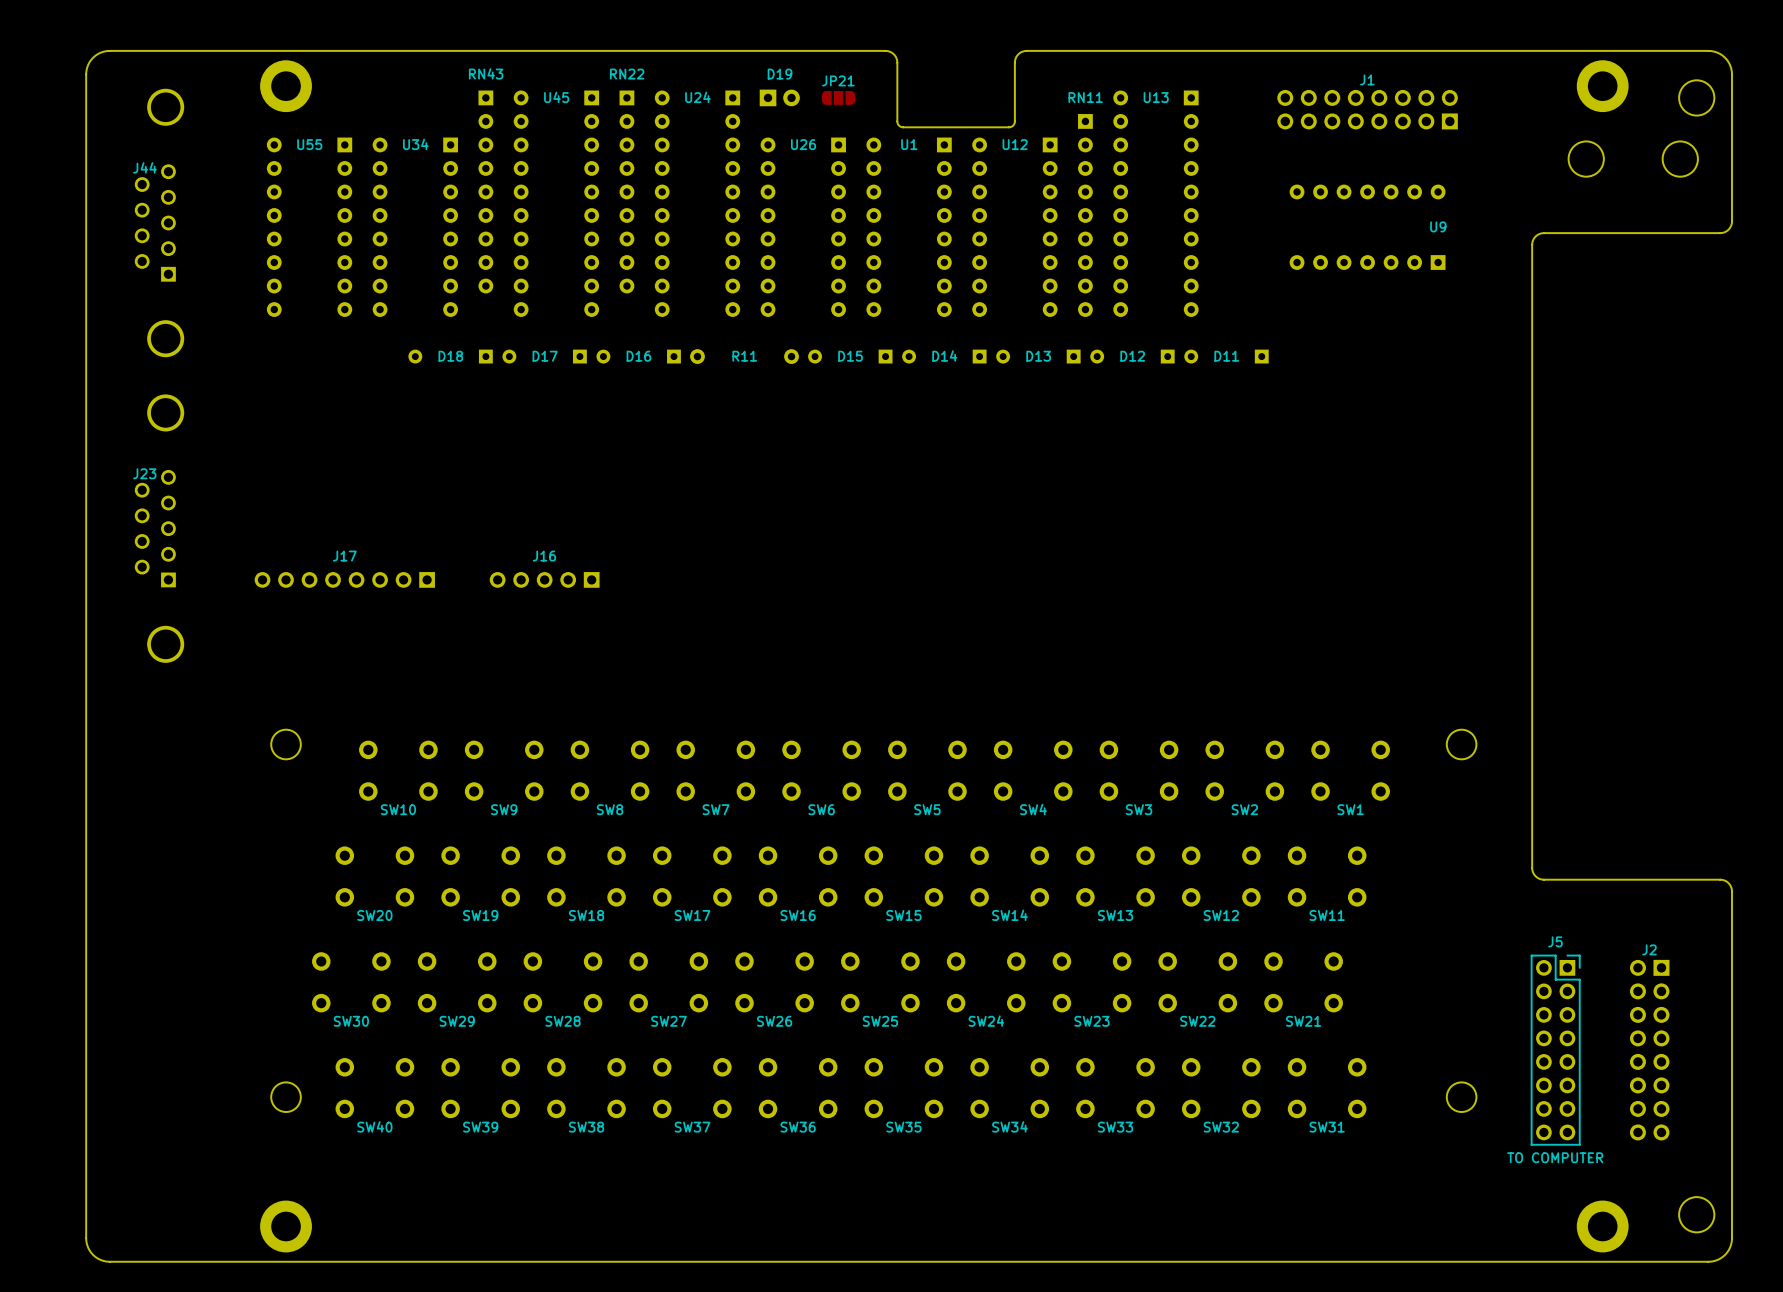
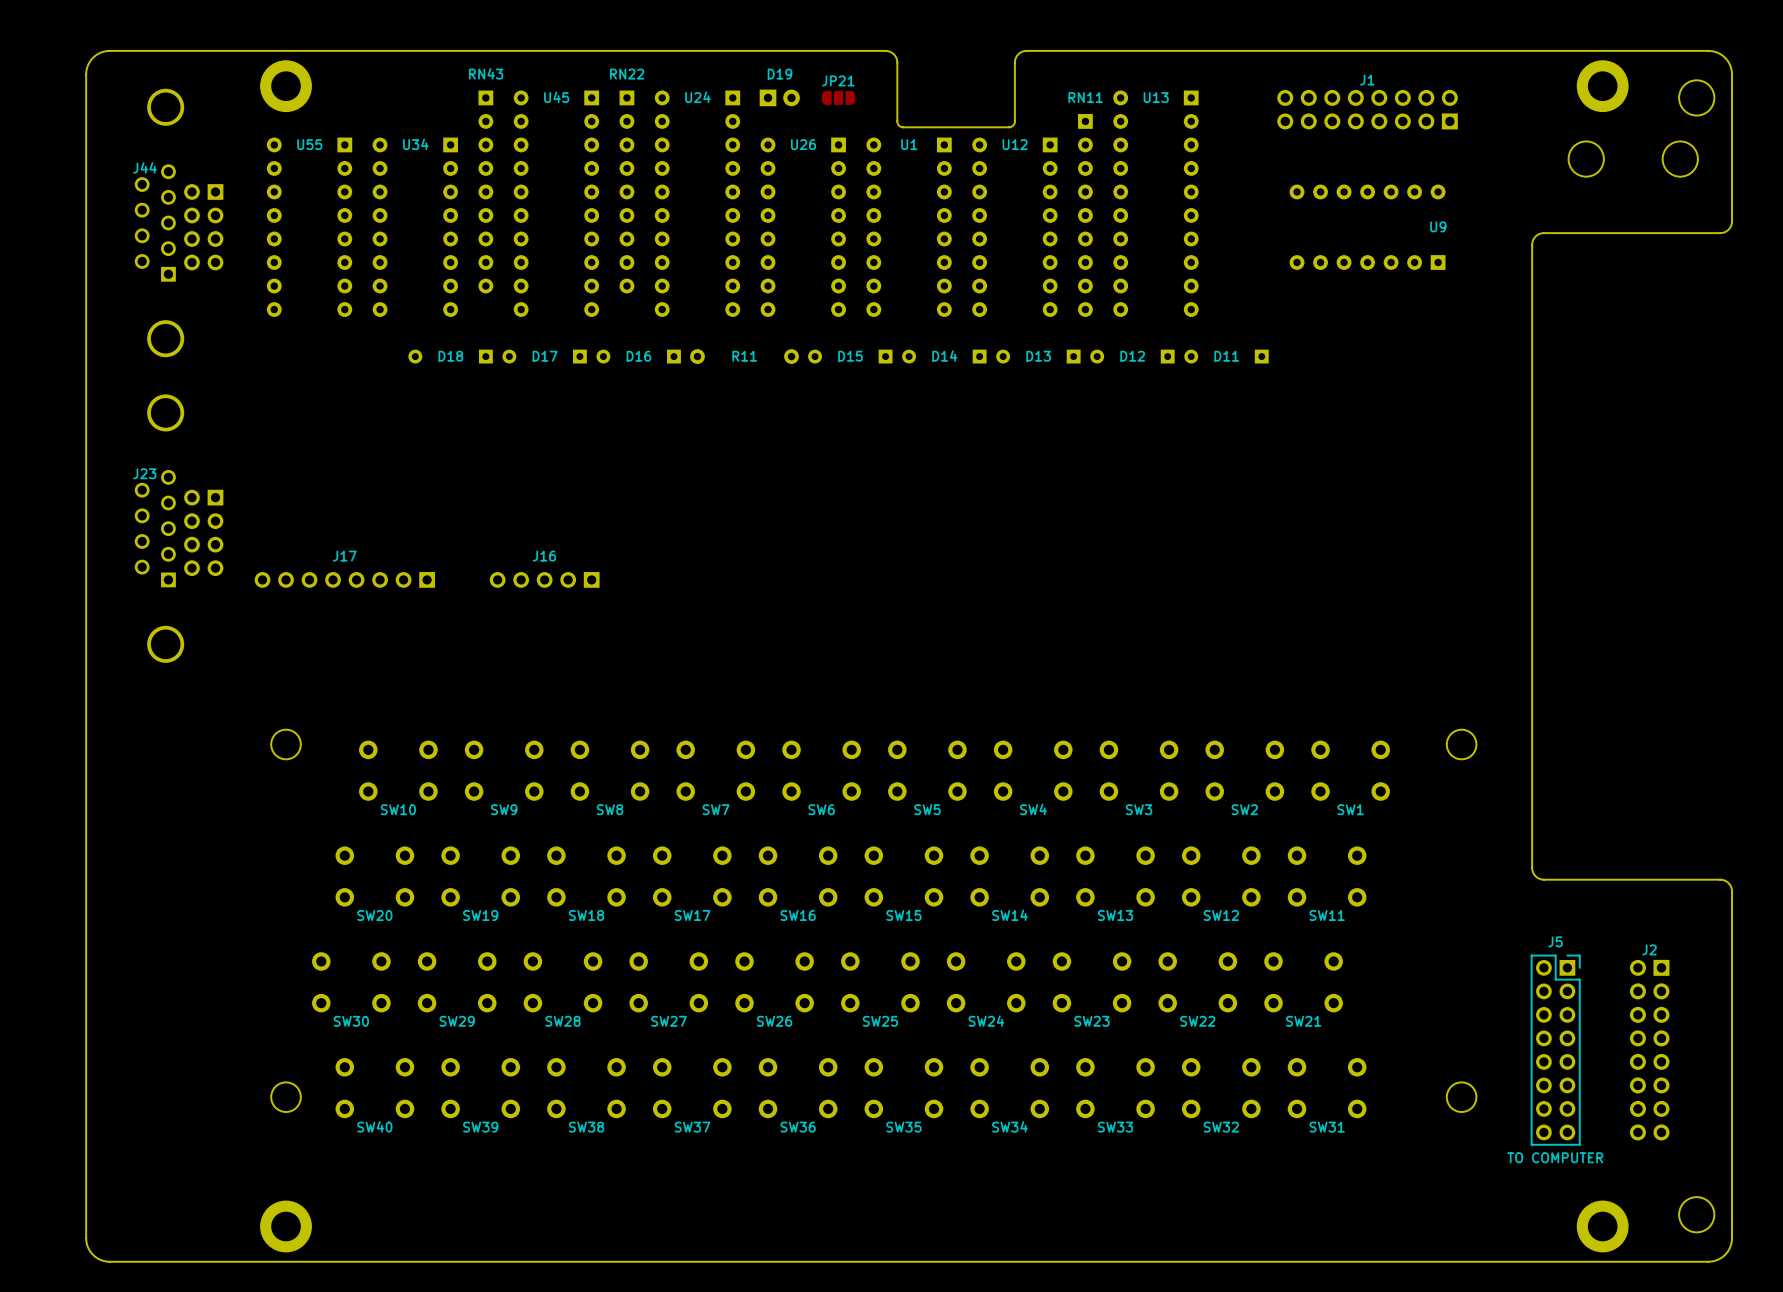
part: none -> (203, 227)
part: none -> (203, 532)

